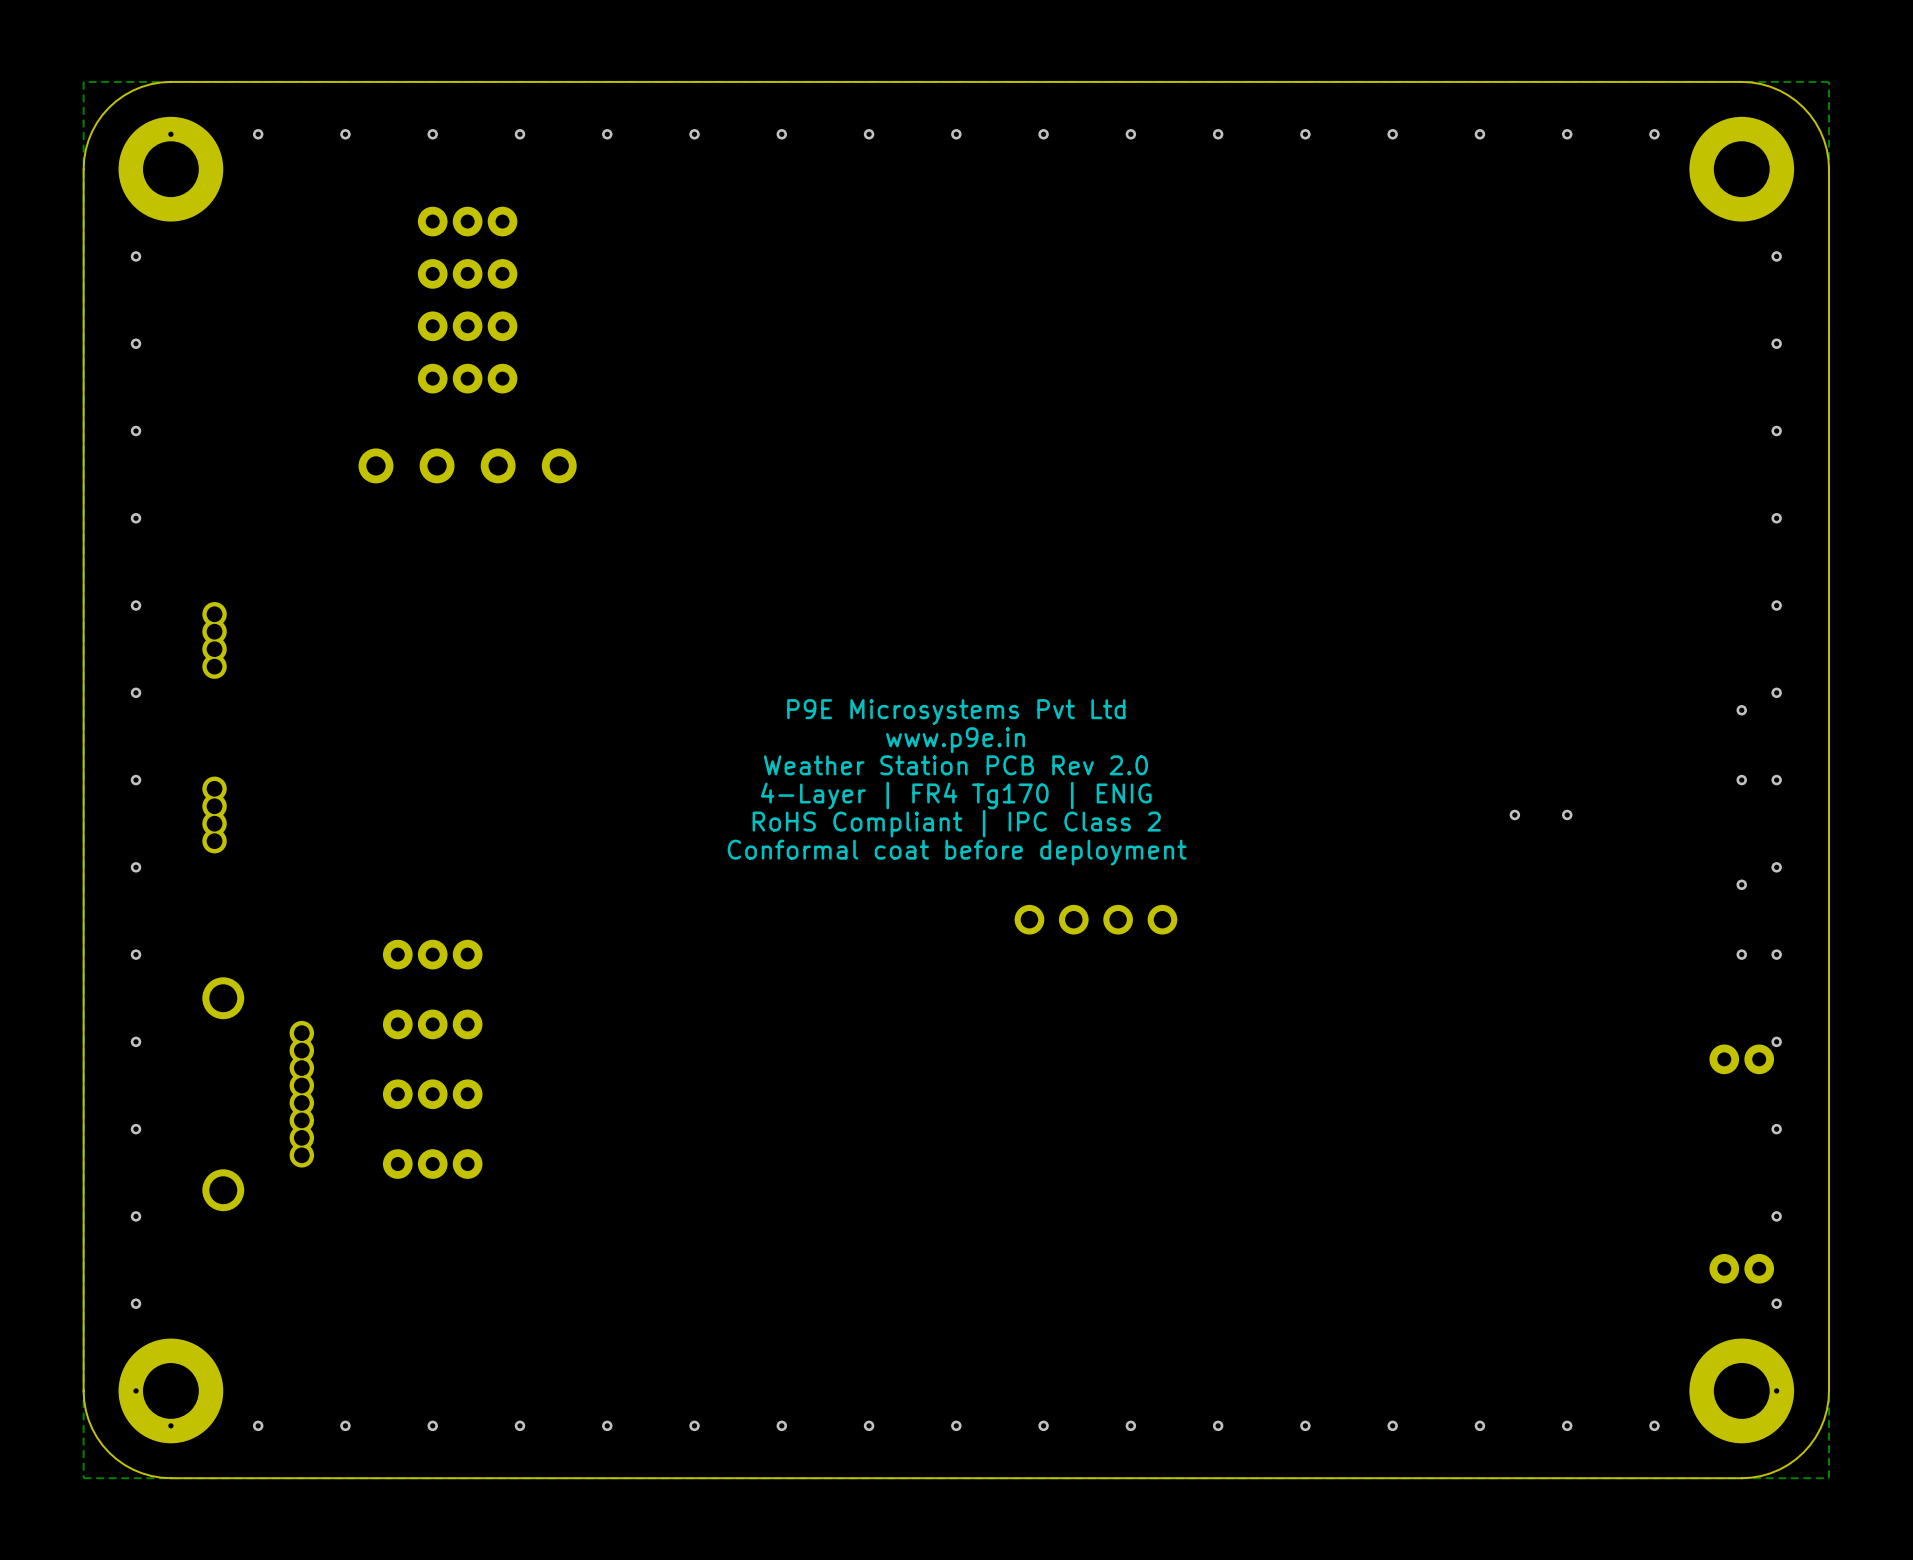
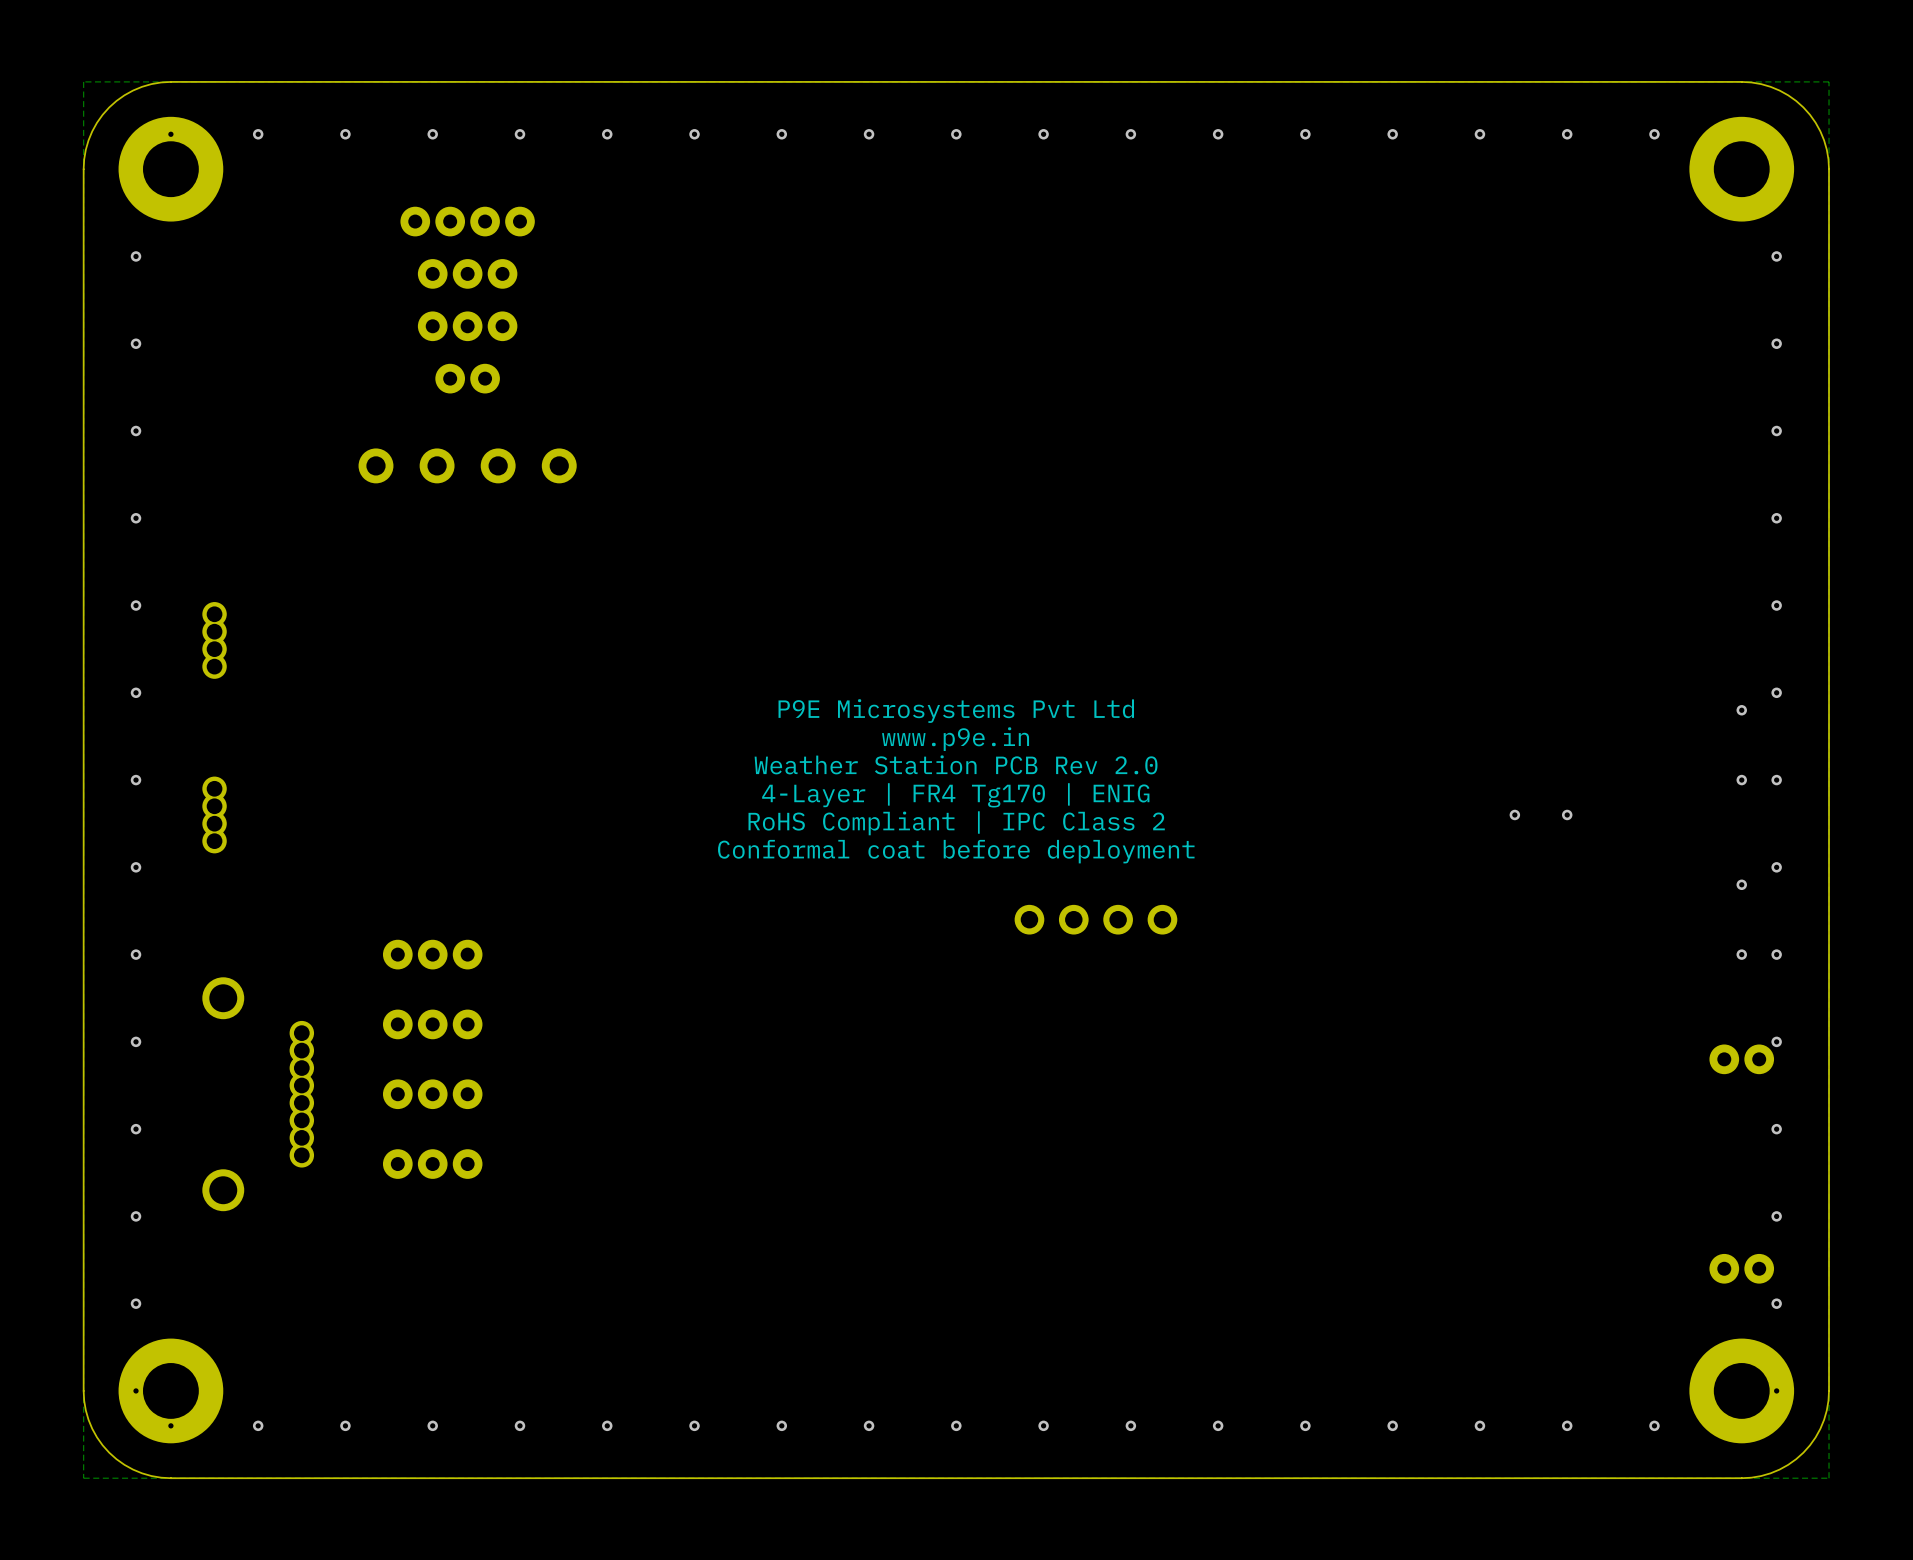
part footprint: [417, 206, 518, 237] -> [400, 206, 535, 237]
part footprint: [417, 363, 518, 394] -> [435, 363, 500, 394]

